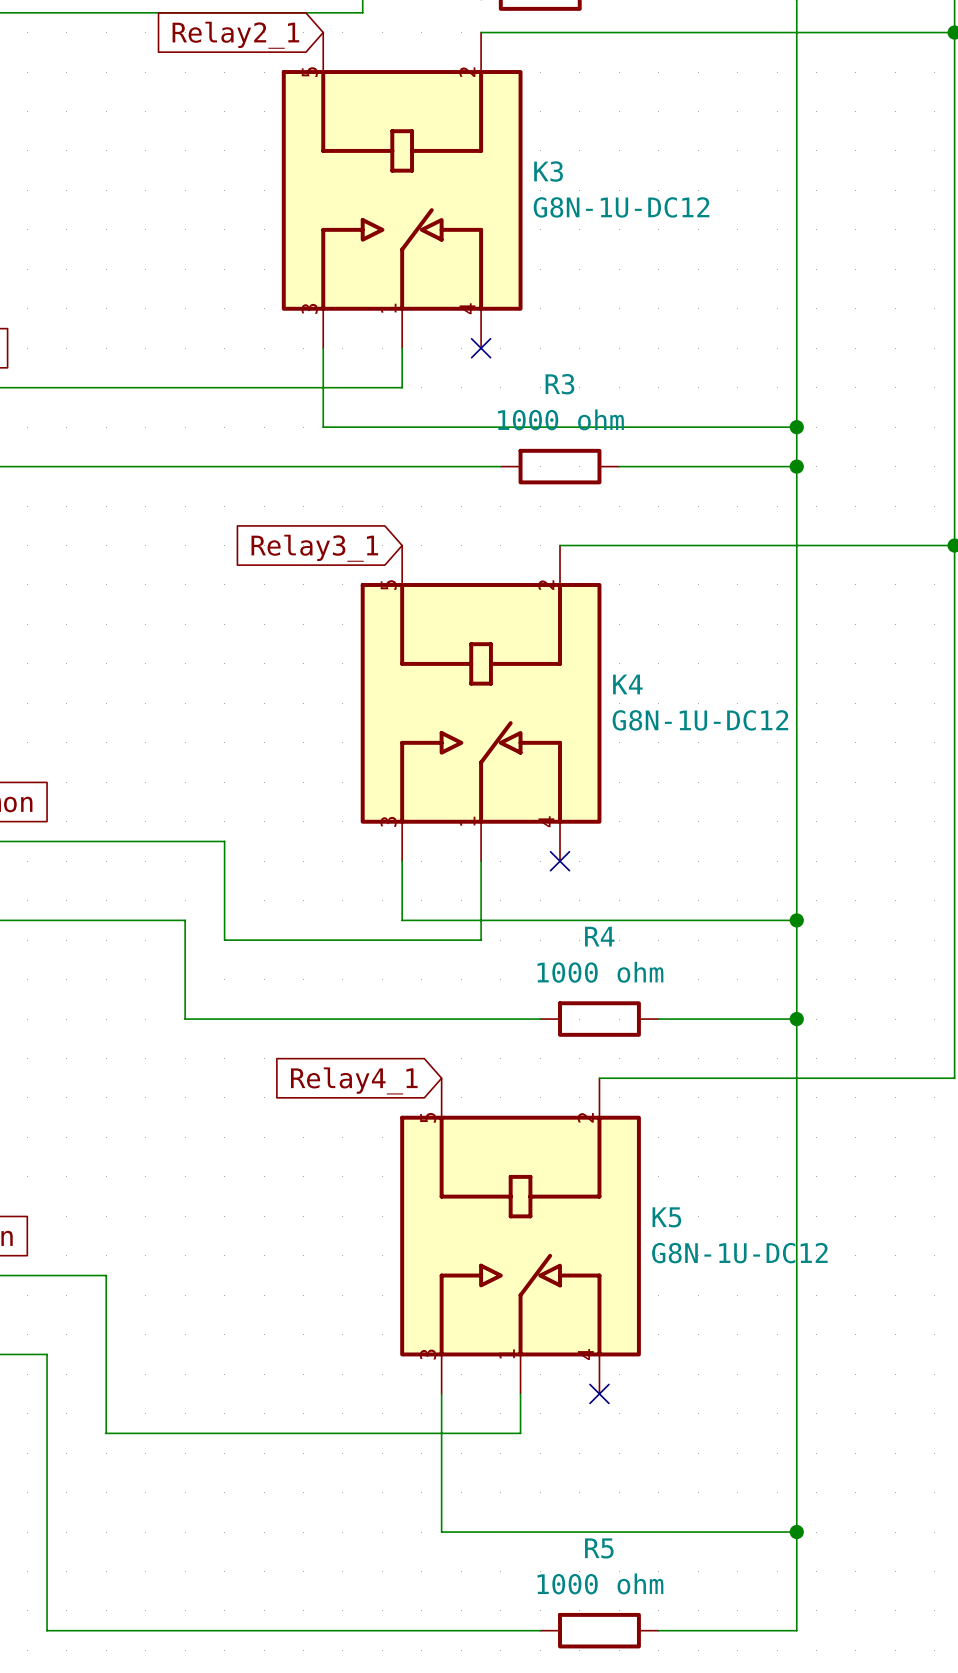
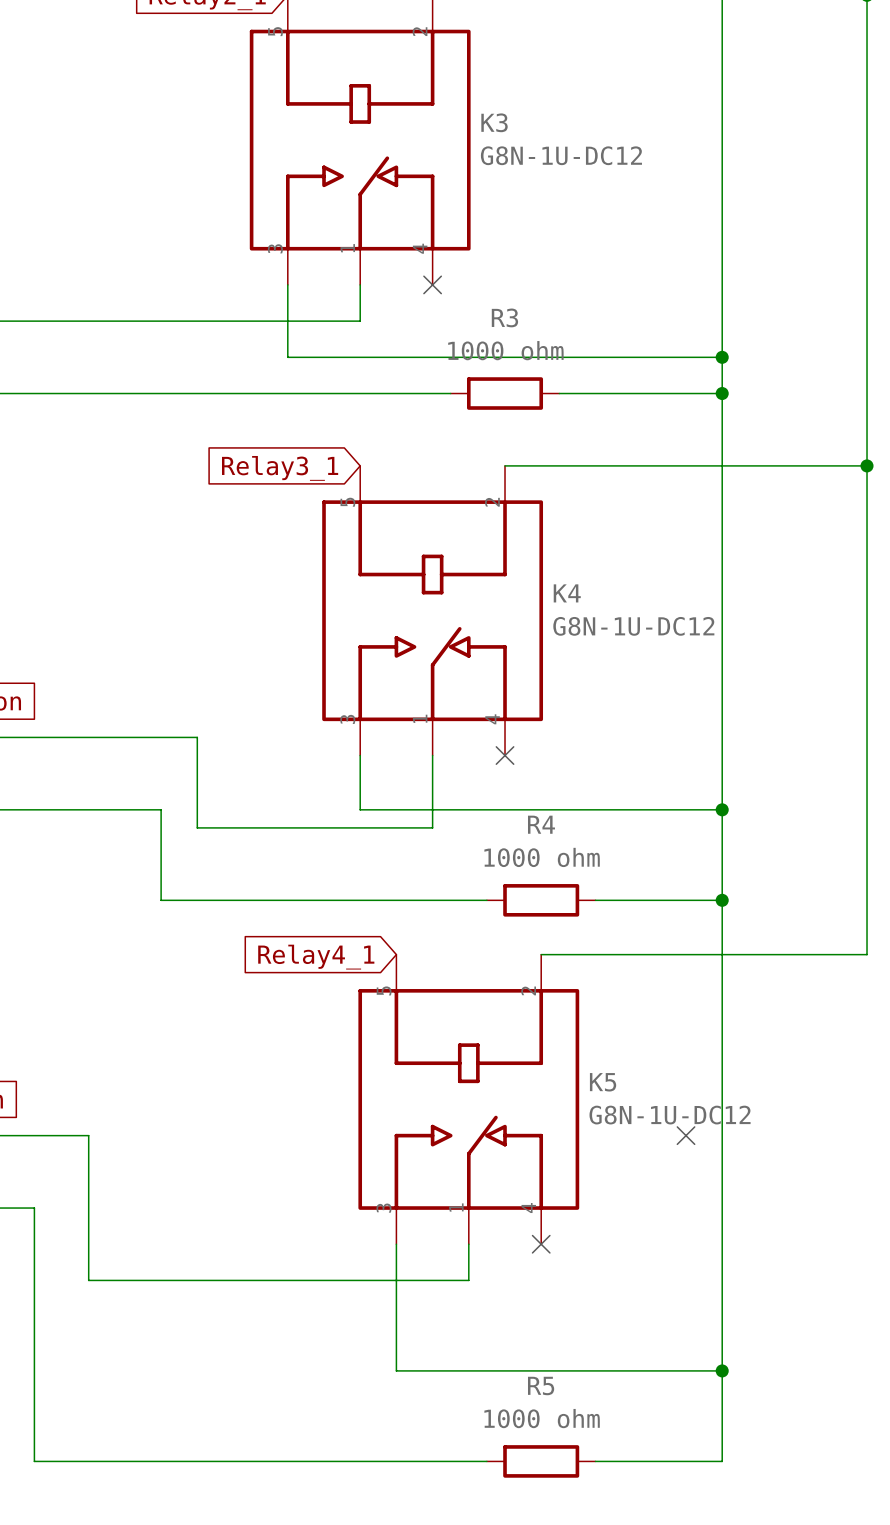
no-connect mark: none -> (686, 1135)

